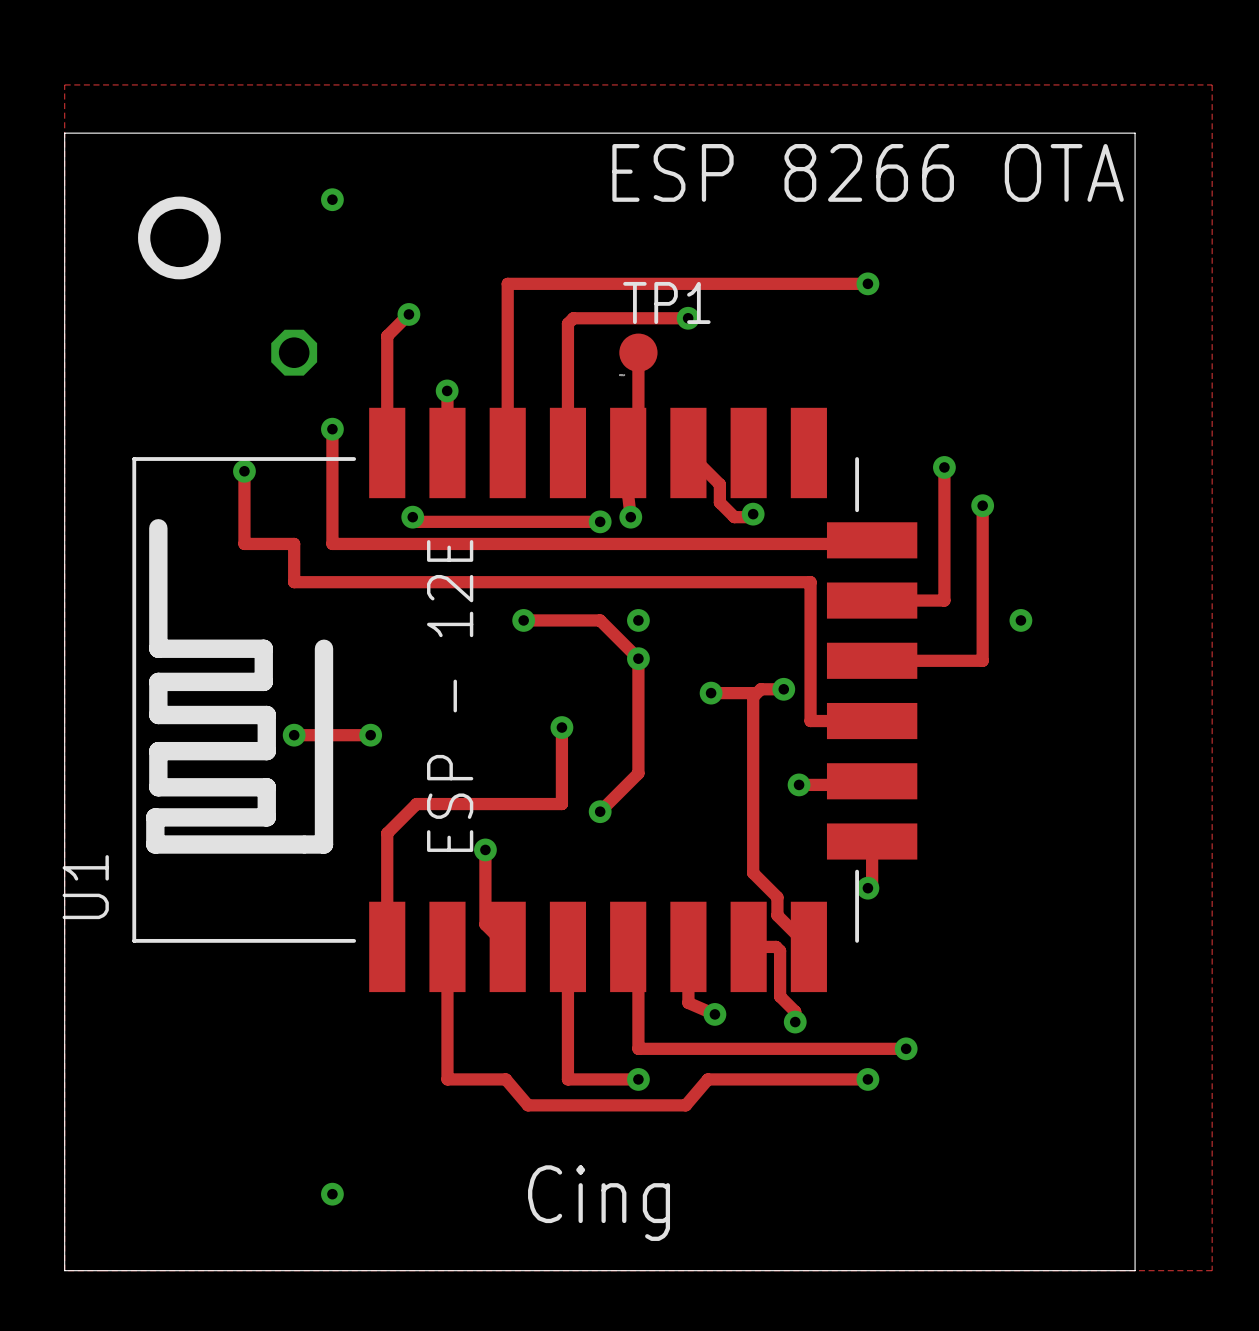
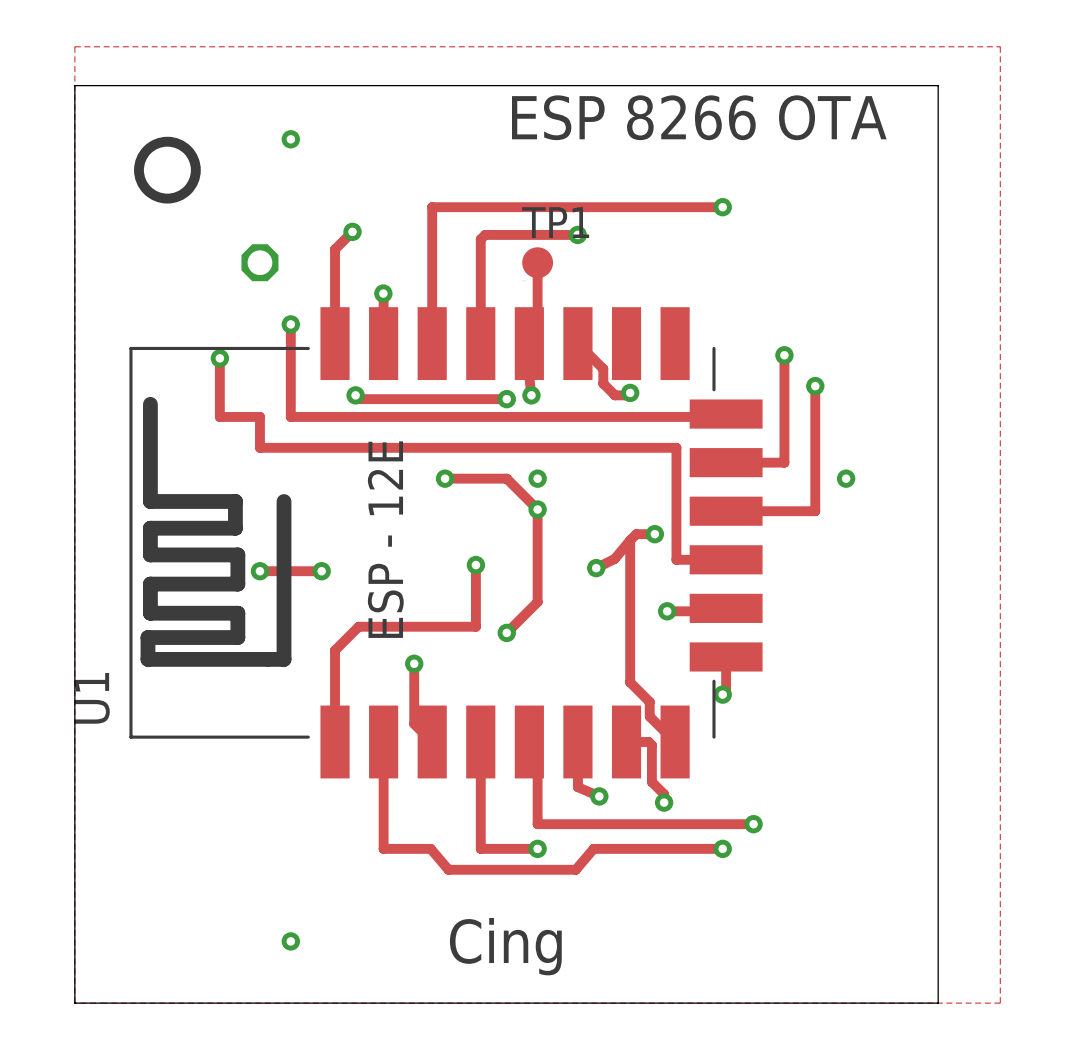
track: (711, 693) (753, 693) (753, 696) -> (596, 568) (614, 558) (630, 540)
via position: (711, 693) -> (596, 568)

